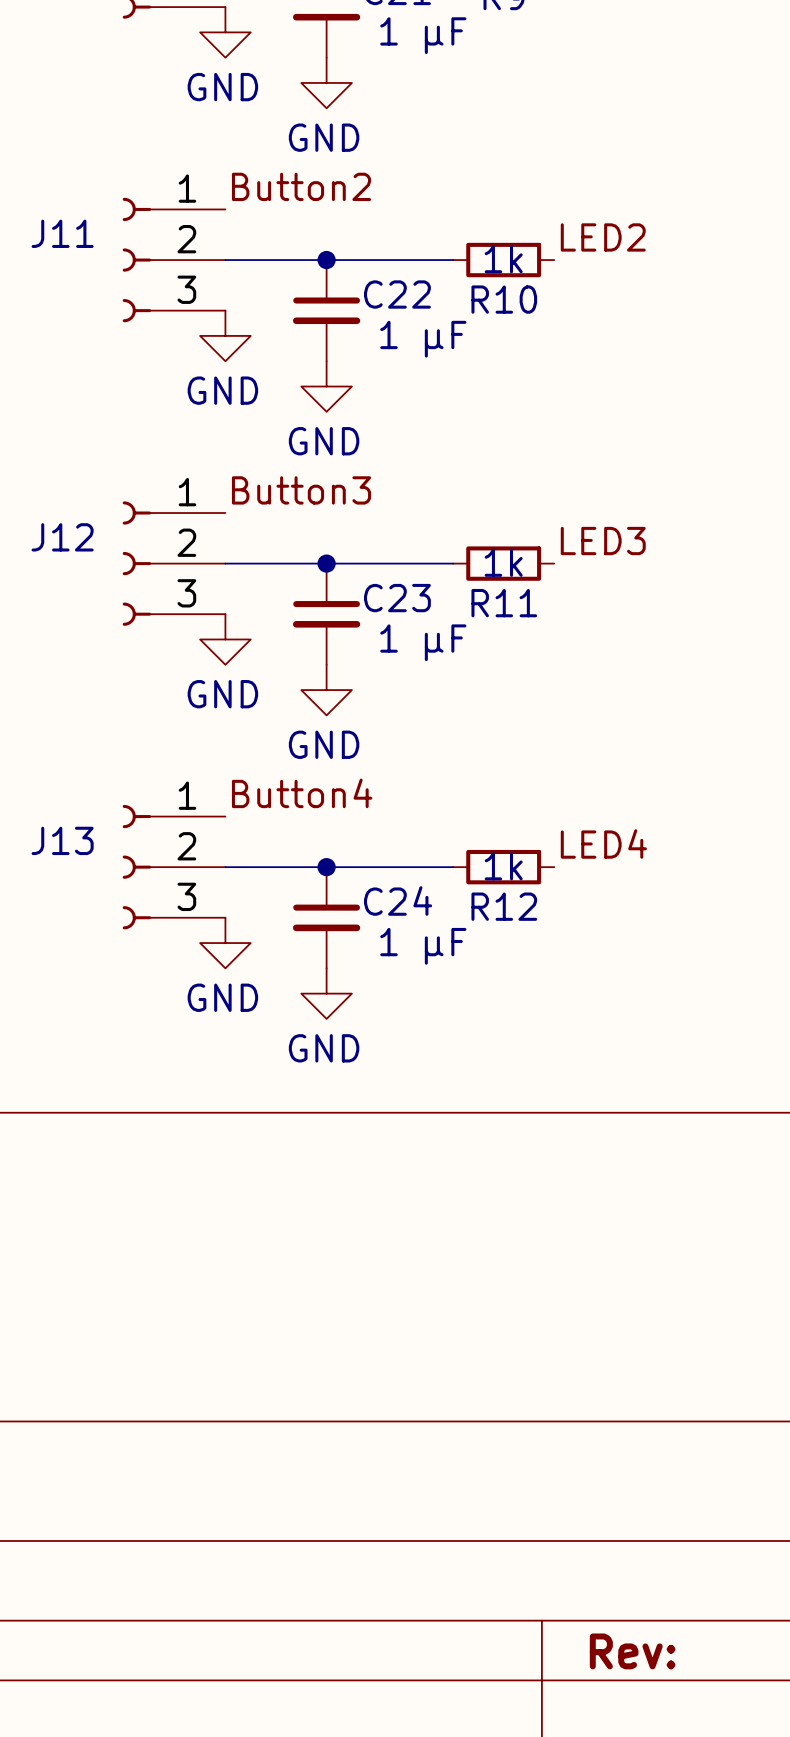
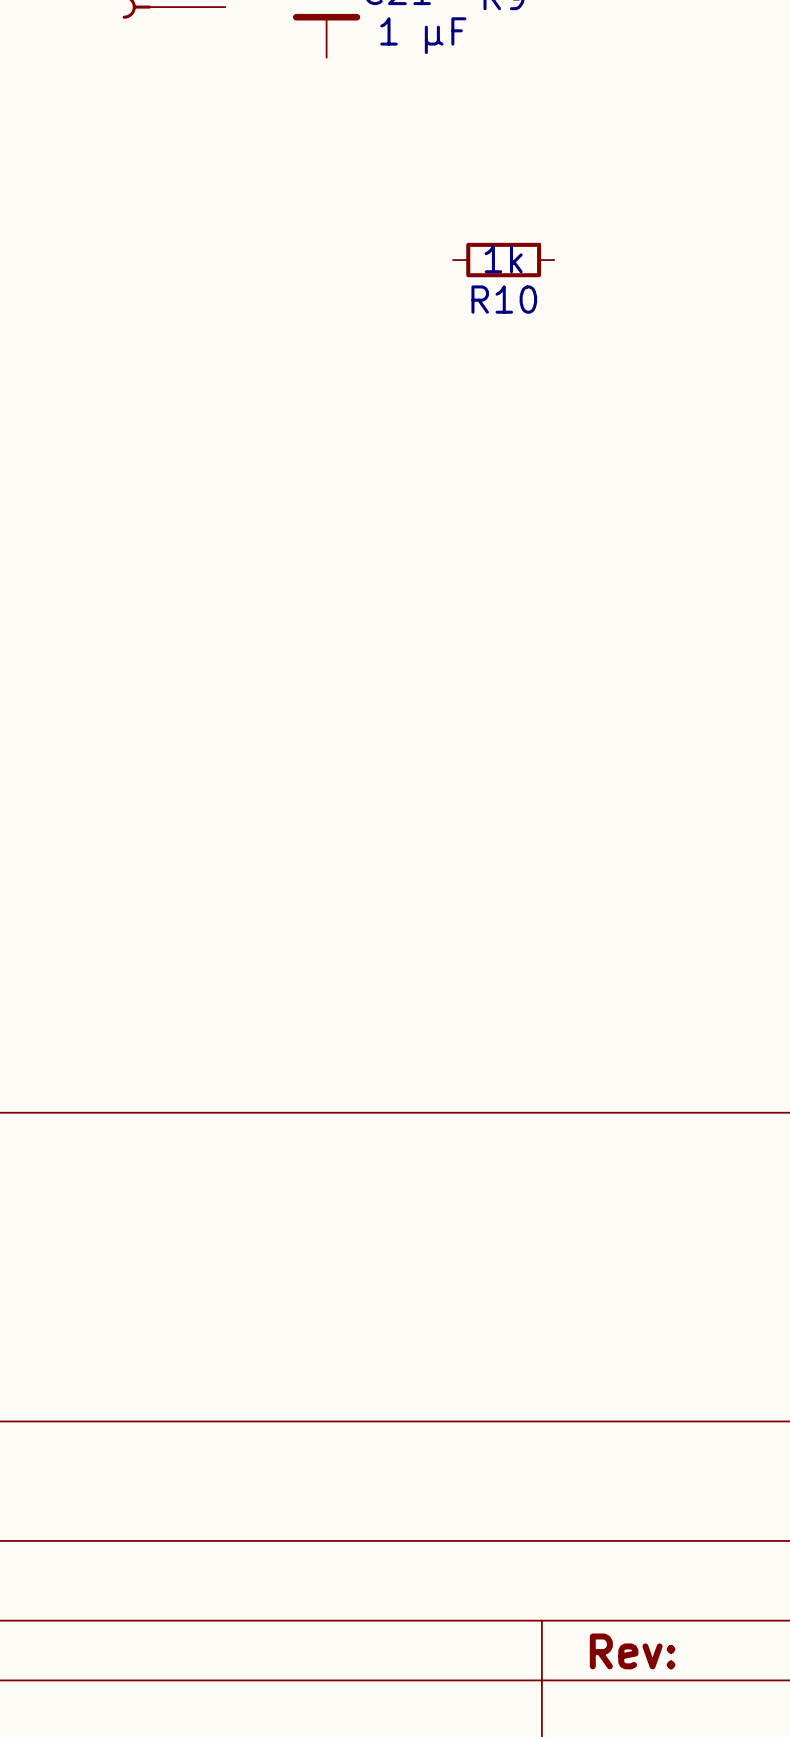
power symbol: GND (225, 32) -> none
power symbol: GND (326, 82) -> none
label: Button2 (301, 186) -> none
label: LED2 (603, 237) -> none
J11: (174, 260) -> none
wire: (225, 260) (453, 260) -> none
junction: (326, 260) -> none
C22: 1 µF (326, 310) -> none
power symbol: GND (225, 335) -> none
power symbol: GND (326, 386) -> none
label: Button3 (301, 490) -> none
label: LED3 (603, 541) -> none
J12: (174, 563) -> none
wire: (225, 563) (453, 563) -> none
junction: (326, 563) -> none
R11: 1k (503, 563) -> none
C23: 1 µF (326, 614) -> none
power symbol: GND (225, 639) -> none
power symbol: GND (326, 690) -> none
label: Button4 (302, 793) -> none
label: LED4 (603, 843) -> none
J13: (174, 867) -> none
wire: (225, 867) (453, 867) -> none
junction: (326, 867) -> none
R12: 1k (503, 867) -> none
C24: 1 µF (326, 917) -> none
power symbol: GND (225, 943) -> none
power symbol: GND (326, 993) -> none

